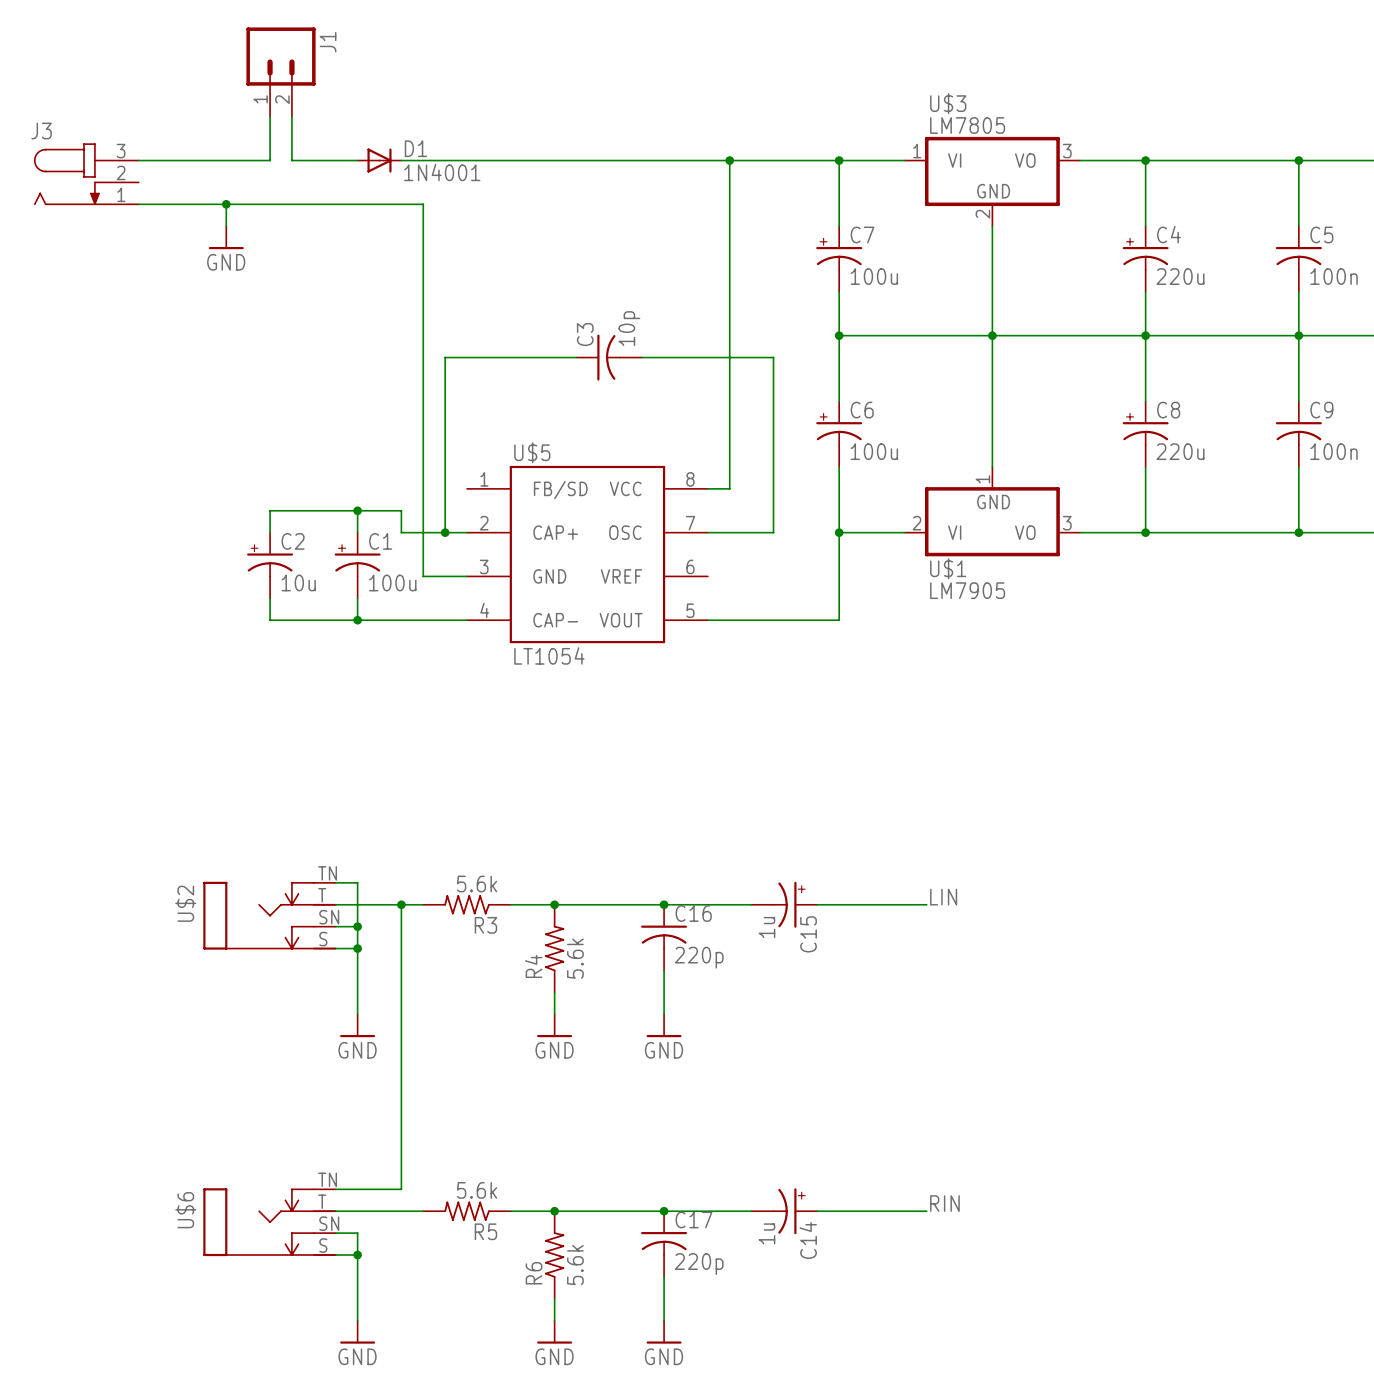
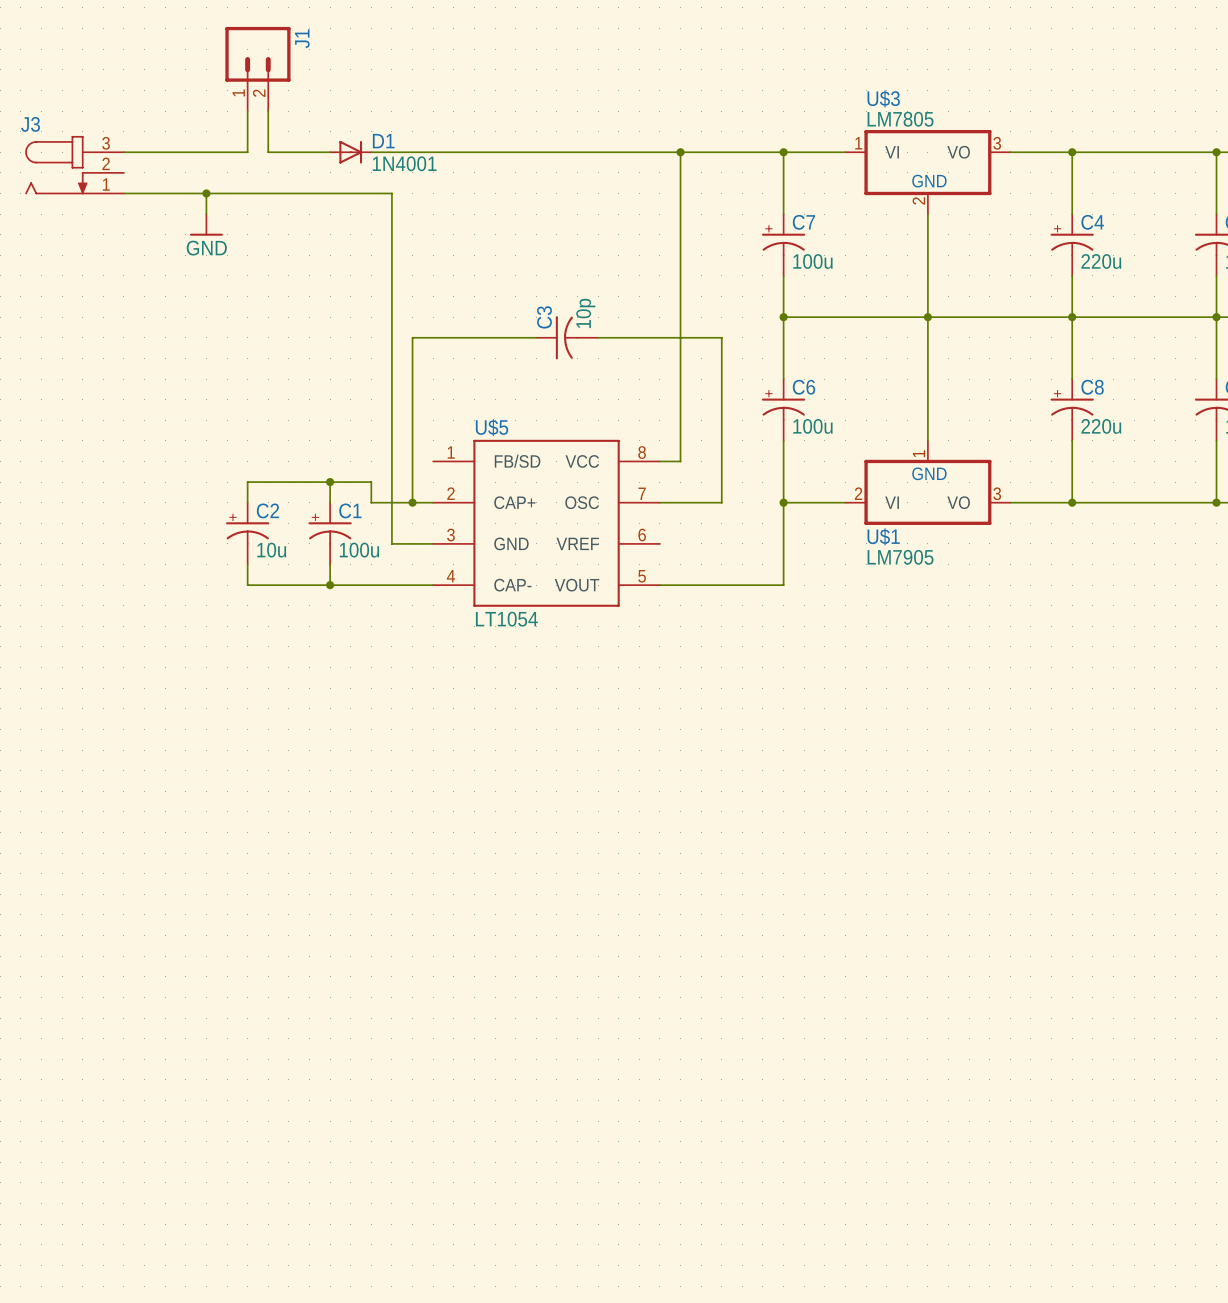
wire: (335, 882) (357, 882) (357, 1014) -> none
label: LIN (943, 897) -> none
wire: (335, 904) (423, 904) -> none
wire: (401, 904) (401, 1189) (335, 1189) -> none
junction: (401, 904) -> none
R3: 5.6k (467, 904) -> none
wire: (510, 904) (751, 904) -> none
junction: (554, 904) -> none
junction: (664, 904) -> none
C15: 1u (784, 904) -> none
wire: (817, 904) (926, 904) -> none
U$2: (269, 915) -> none
wire: (335, 926) (357, 926) -> none
junction: (357, 926) -> none
C16: 220p (664, 937) -> none
wire: (335, 948) (357, 948) -> none
junction: (357, 948) -> none
R4: 5.6k (554, 948) -> none
wire: (664, 970) (664, 1014) -> none
wire: (554, 992) (554, 1014) -> none
power symbol: GND (357, 1025) -> none
power symbol: GND (554, 1025) -> none
power symbol: GND (664, 1025) -> none
label: RIN (944, 1203) -> none
wire: (335, 1211) (423, 1211) -> none
R5: 5.6k (467, 1211) -> none
wire: (510, 1211) (751, 1211) -> none
junction: (554, 1211) -> none
junction: (664, 1211) -> none
C14: 1u (784, 1211) -> none
wire: (817, 1211) (926, 1211) -> none
U$6: (269, 1222) -> none
wire: (335, 1233) (357, 1233) (357, 1320) -> none
C17: 220p (664, 1244) -> none
wire: (335, 1255) (357, 1255) -> none
junction: (357, 1255) -> none
R6: 5.6k (554, 1255) -> none
wire: (664, 1276) (664, 1320) -> none
wire: (554, 1298) (554, 1320) -> none
power symbol: GND (357, 1332) -> none
power symbol: GND (554, 1332) -> none
power symbol: GND (664, 1332) -> none

